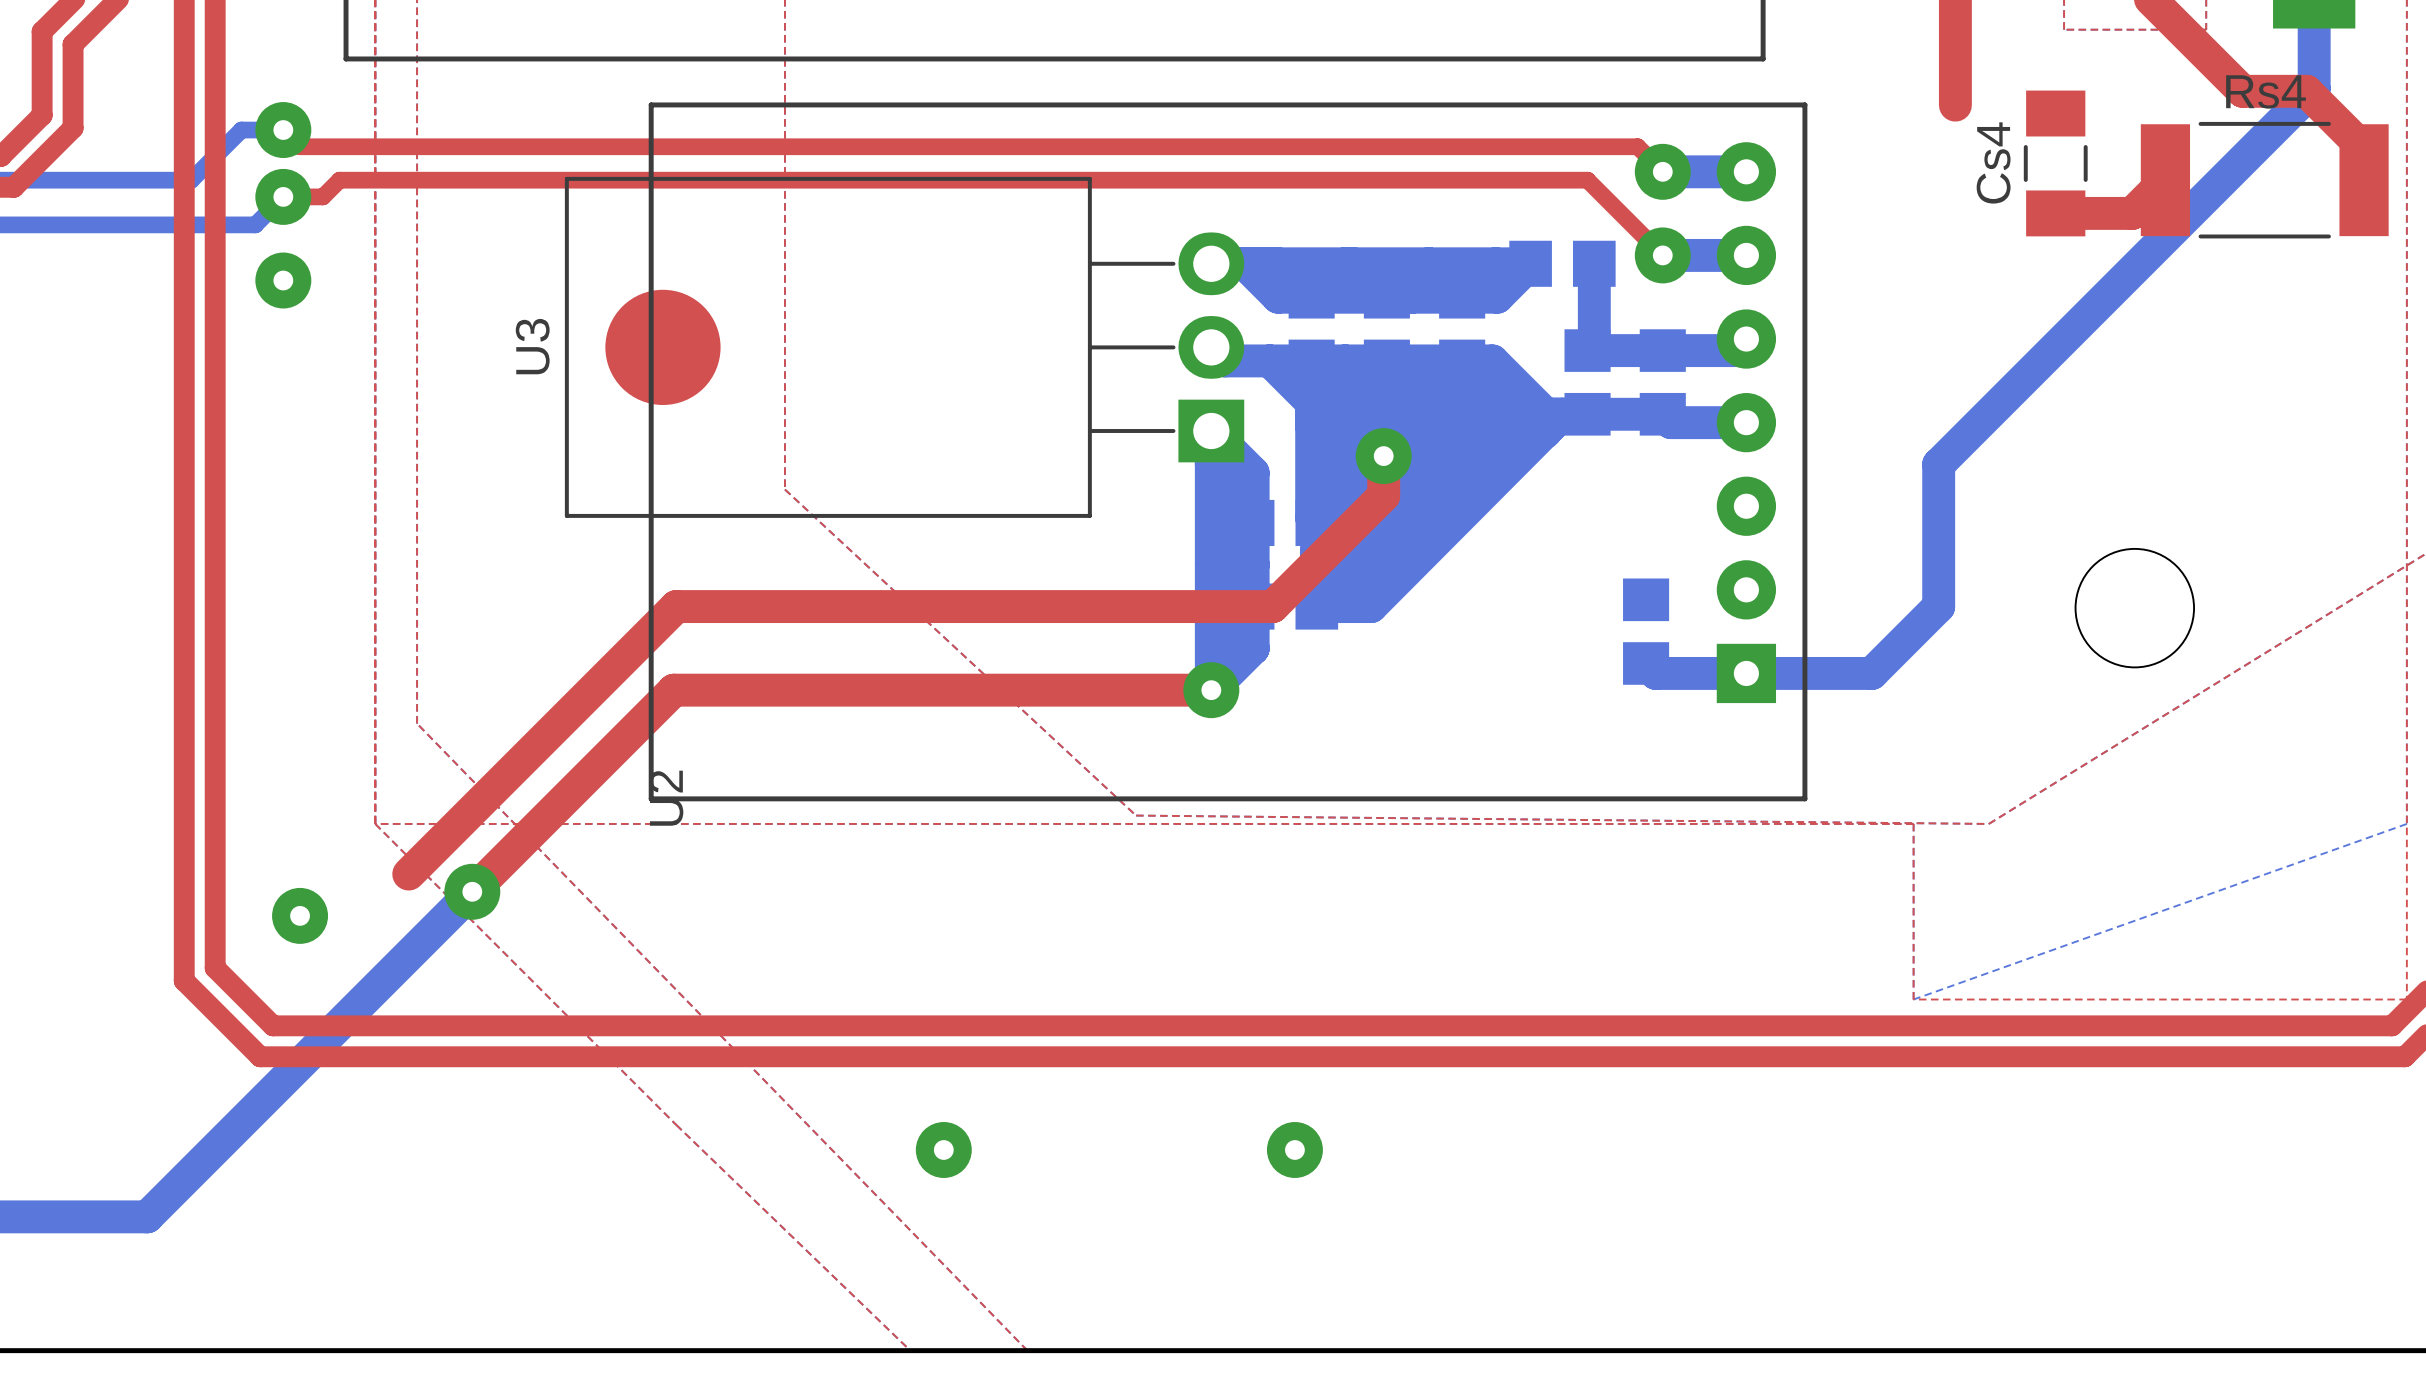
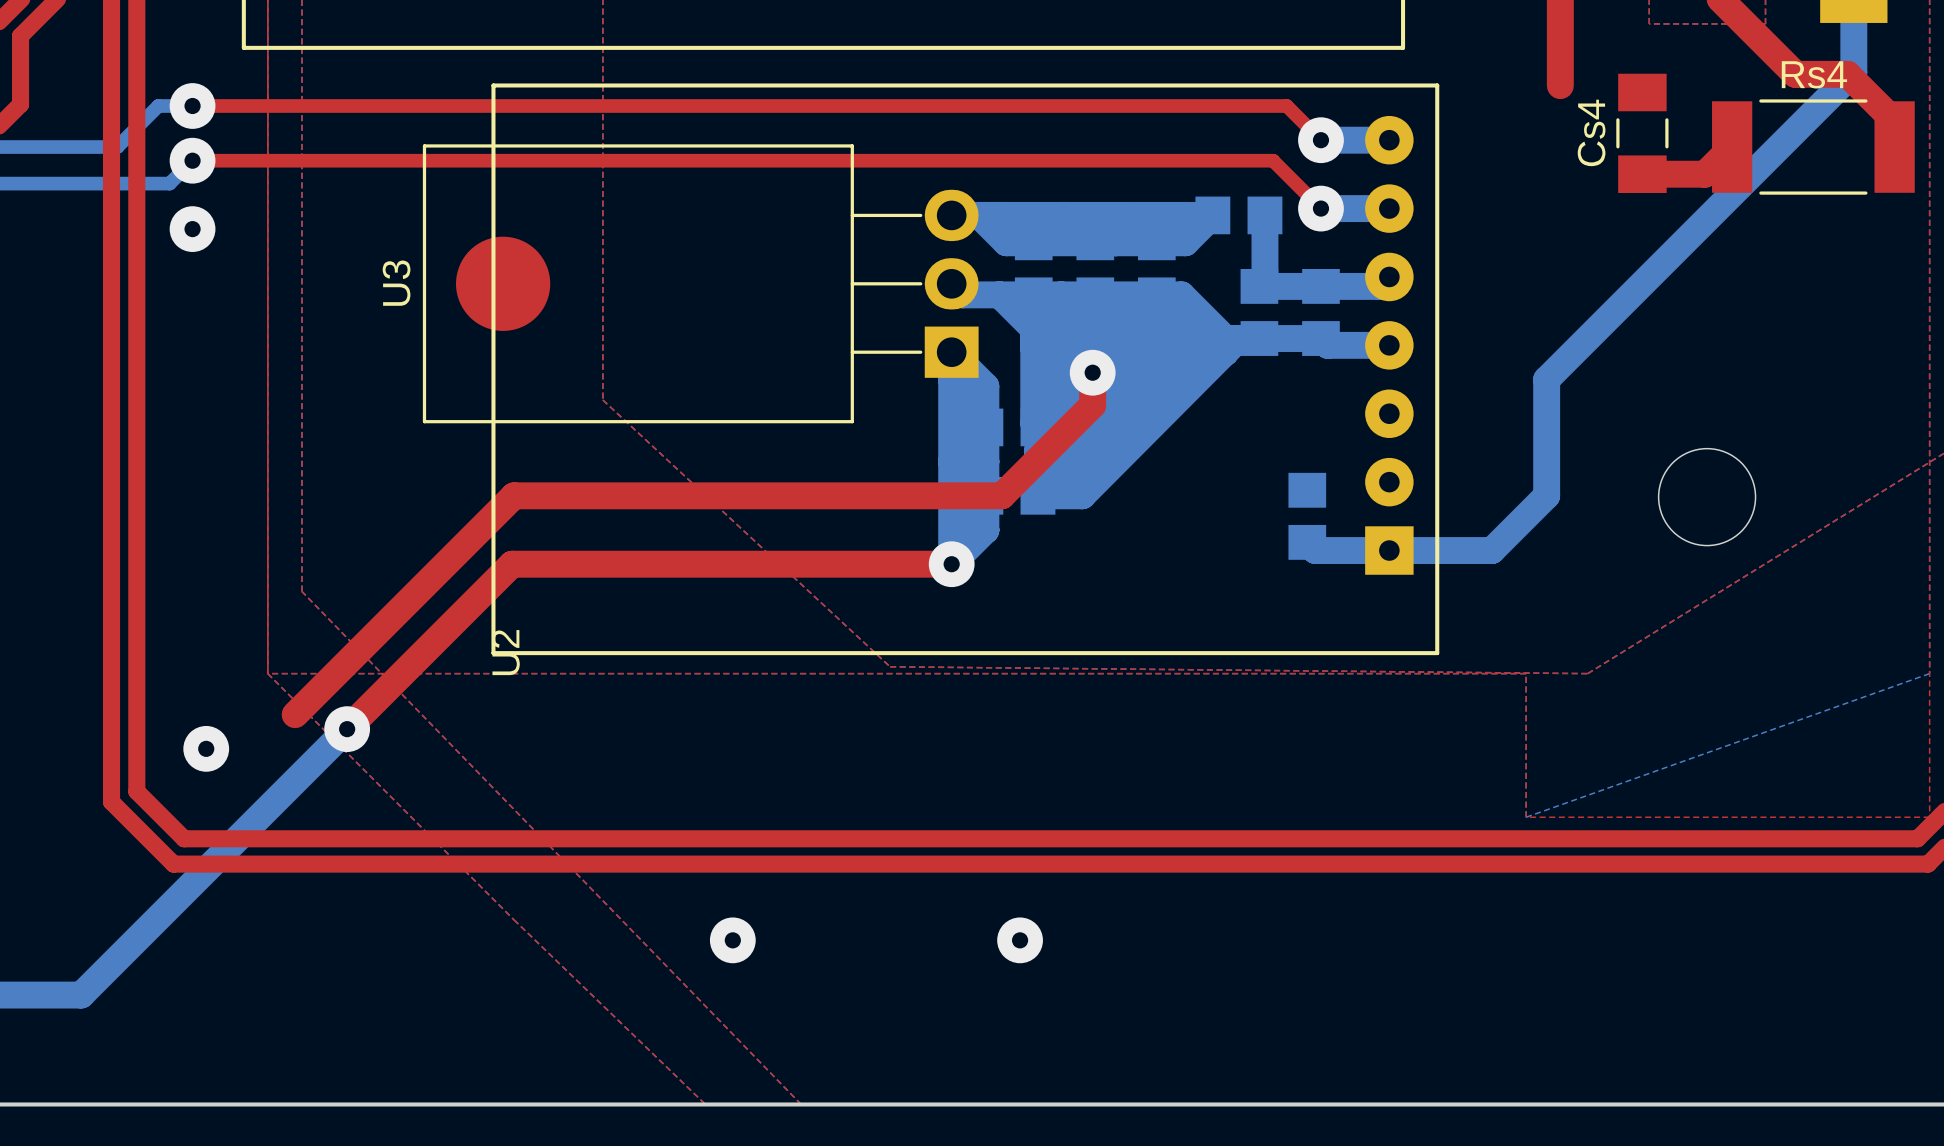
top track: (283, 130) (300, 146) (1637, 146) -> (192, 106) (1286, 106) (1300, 119)
top track: (322, 196) (339, 180) (1587, 180) (1604, 196) -> (224, 160) (1273, 160)

